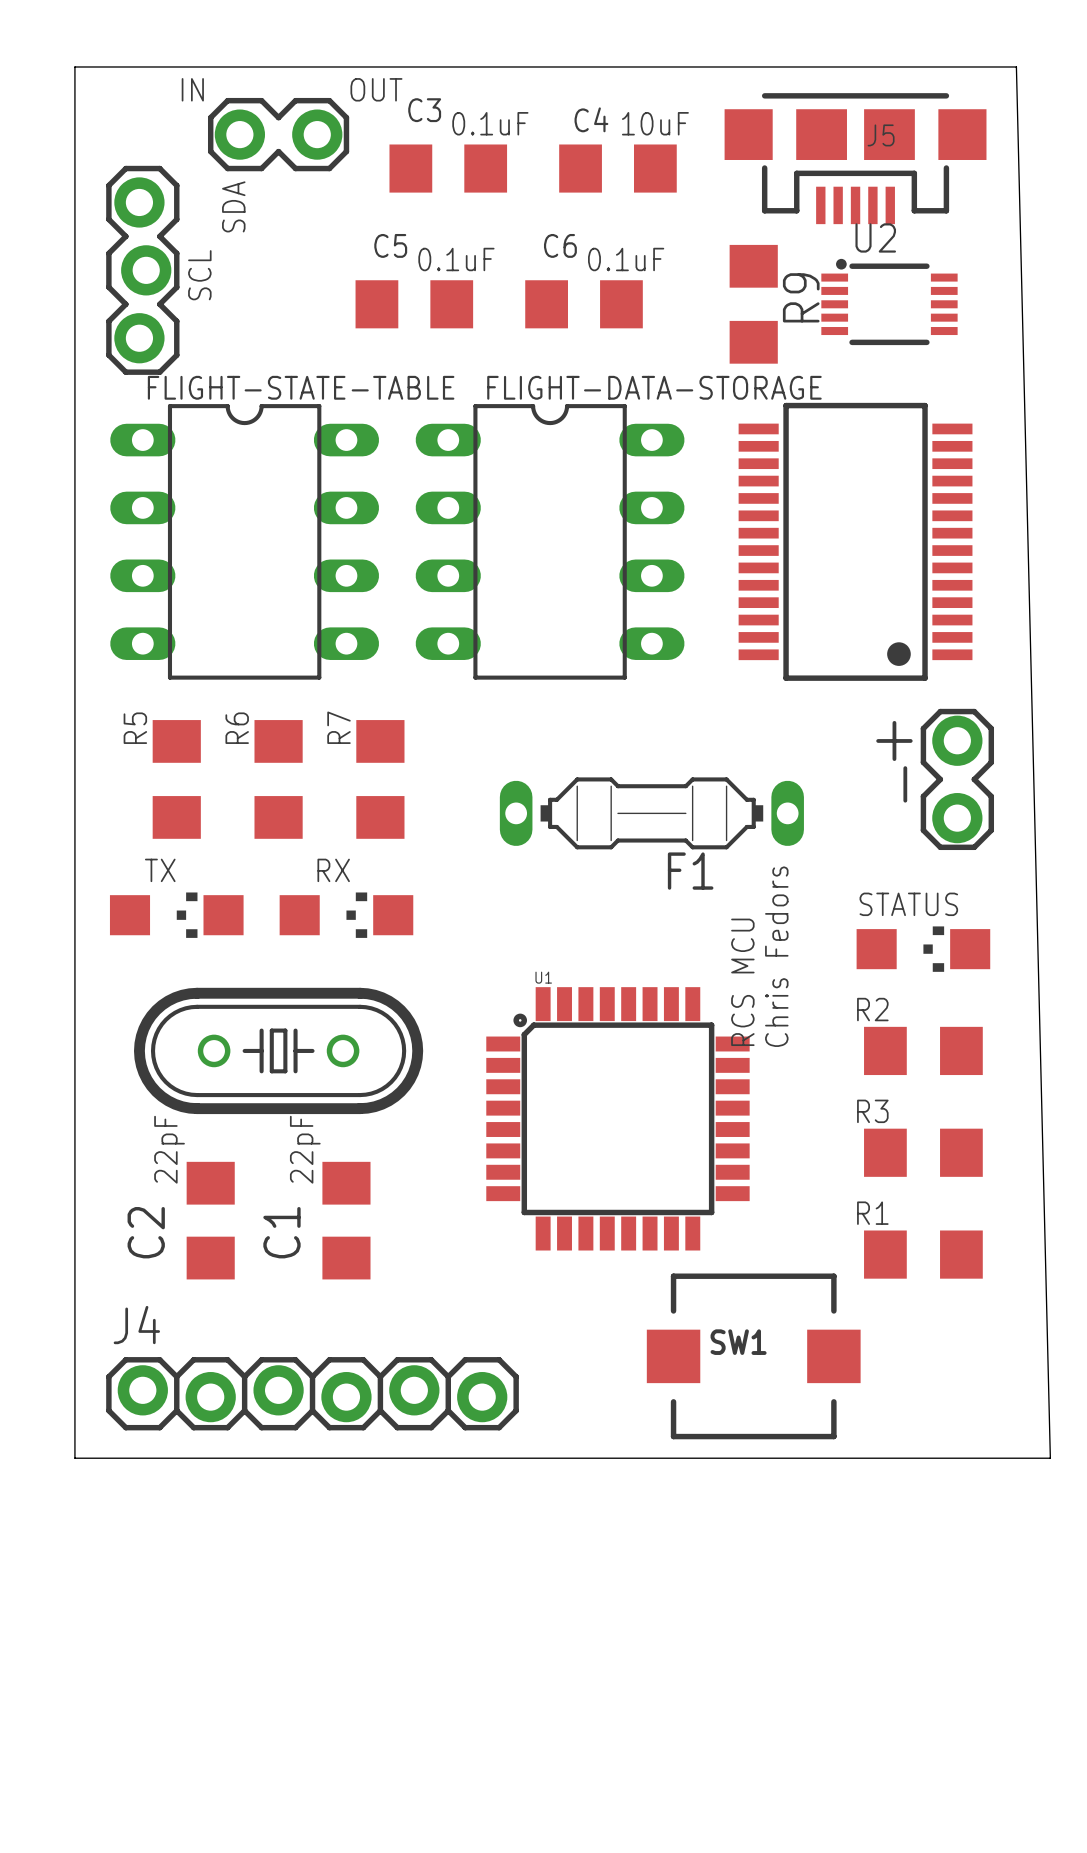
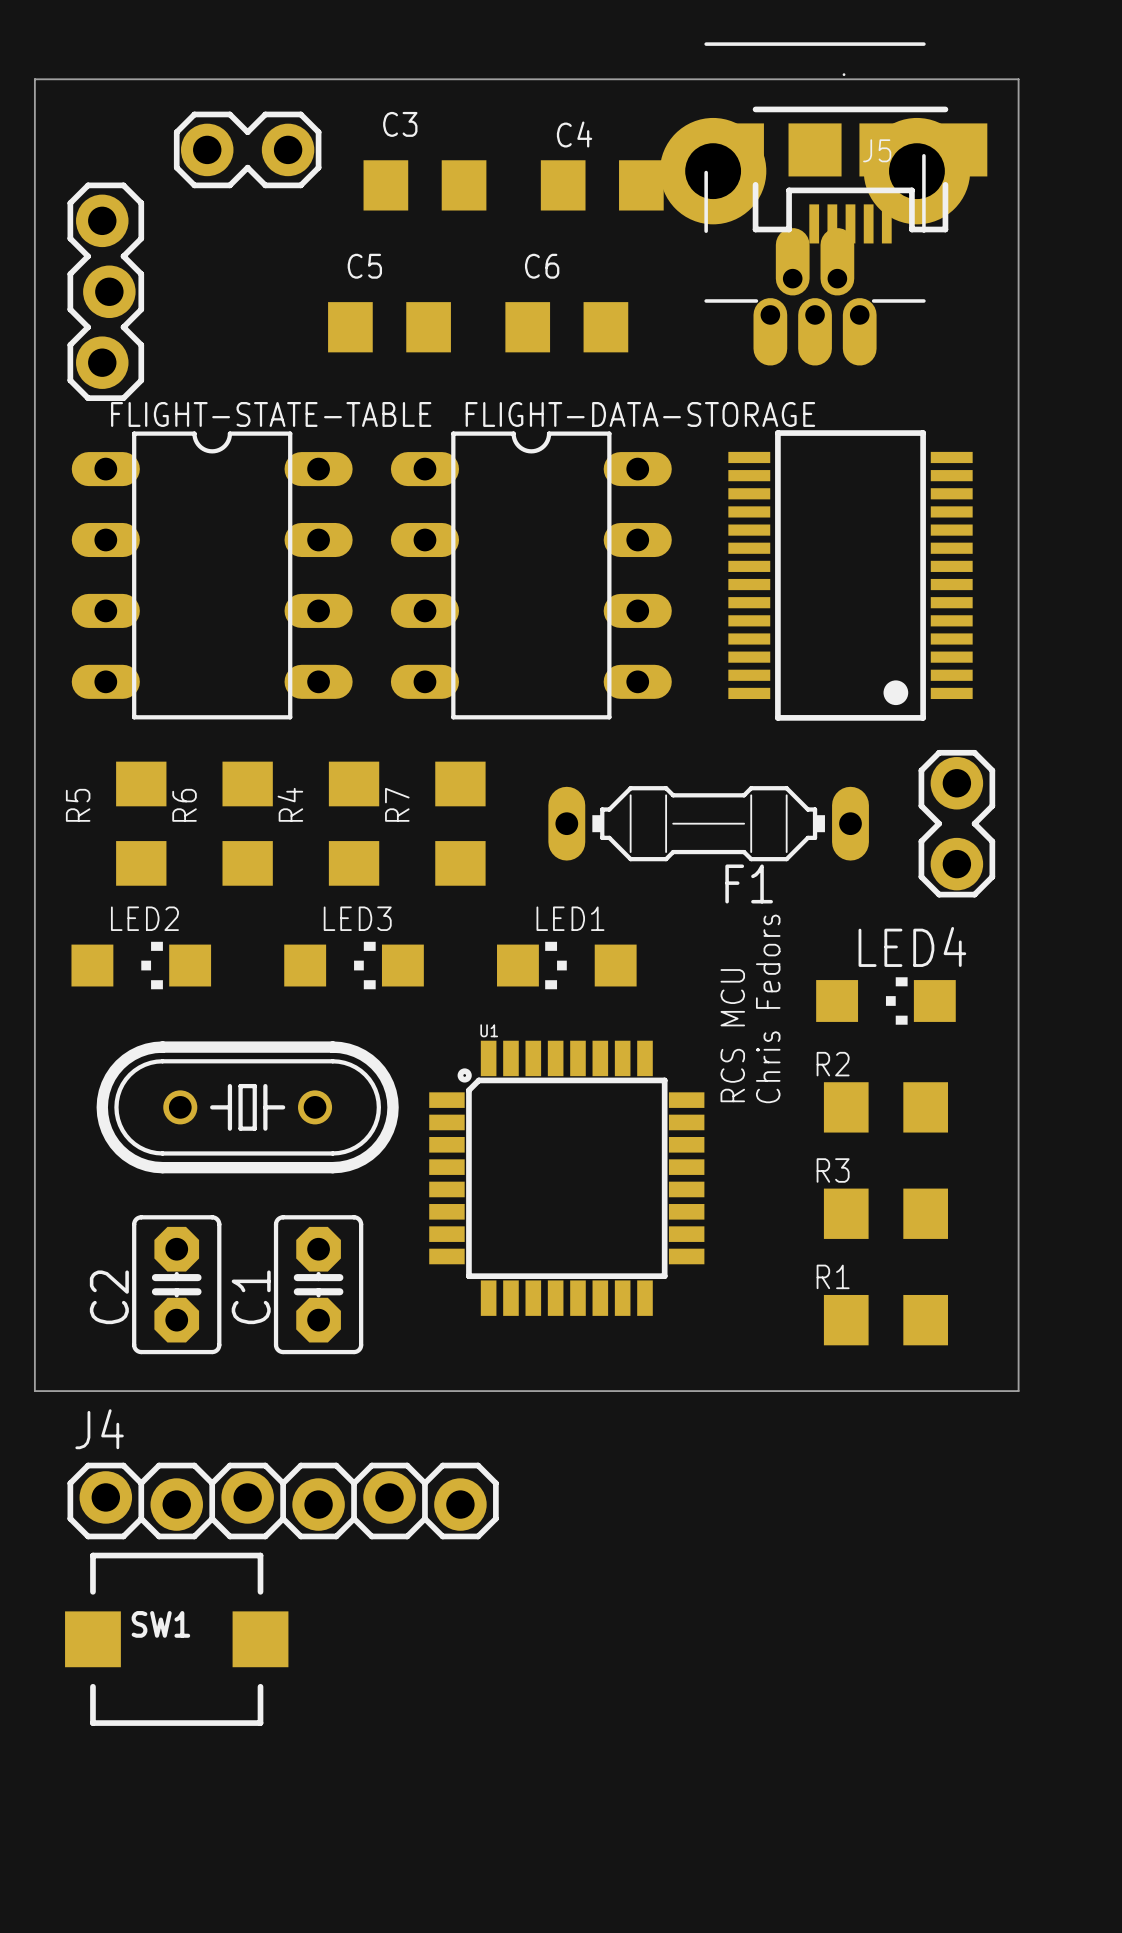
board edge: (1016, 66) (1050, 1458) (74, 1458) (74, 1322) -> (1018, 79) (1018, 1391) (34, 1391)
text: IN (192, 89) -> none
text: OUT (376, 89) -> none
text: 0.1uF (490, 123) -> none
text: 10uF (655, 123) -> none
part: none -> (815, 203)
text: SDA (233, 206) -> none
text: 0.1uF (456, 259) -> none
text: 0.1uF (626, 259) -> none
text: SCL (199, 275) -> none
U2: (889, 301) -> none
R9: (753, 304) -> none
R7 name: R7 (338, 727) -> R4 (290, 804)
R5 name position: R5 (135, 728) -> R5 (78, 805)
R6 name position: R6 (237, 728) -> R6 (184, 805)
text: + (894, 740) -> none
F1 footprint: [499, 777, 804, 850] -> [548, 786, 869, 862]
R7: none -> (460, 823)
text: - (905, 784) -> none
TX name: TX (160, 870) -> LED2 (144, 918)
RX: (346, 915) -> none
LED3: none -> (354, 965)
LED1: none -> (566, 965)
LED4: none -> (885, 1000)
STATUS: (923, 949) -> none
R2 position: (923, 1050) -> (885, 1107)
U1 position: (617, 1118) -> (566, 1178)
text: 22pF (169, 1149) -> none
text: 22pF (305, 1149) -> none
R3 position: (923, 1152) -> (885, 1213)
C2 footprint: [186, 1161, 235, 1280] -> [132, 1215, 222, 1355]
C1 footprint: [322, 1161, 371, 1280] -> [273, 1215, 364, 1355]
R1 position: (923, 1254) -> (885, 1320)
SW1 position: (753, 1356) -> (176, 1639)
J4 position: (312, 1393) -> (283, 1501)

